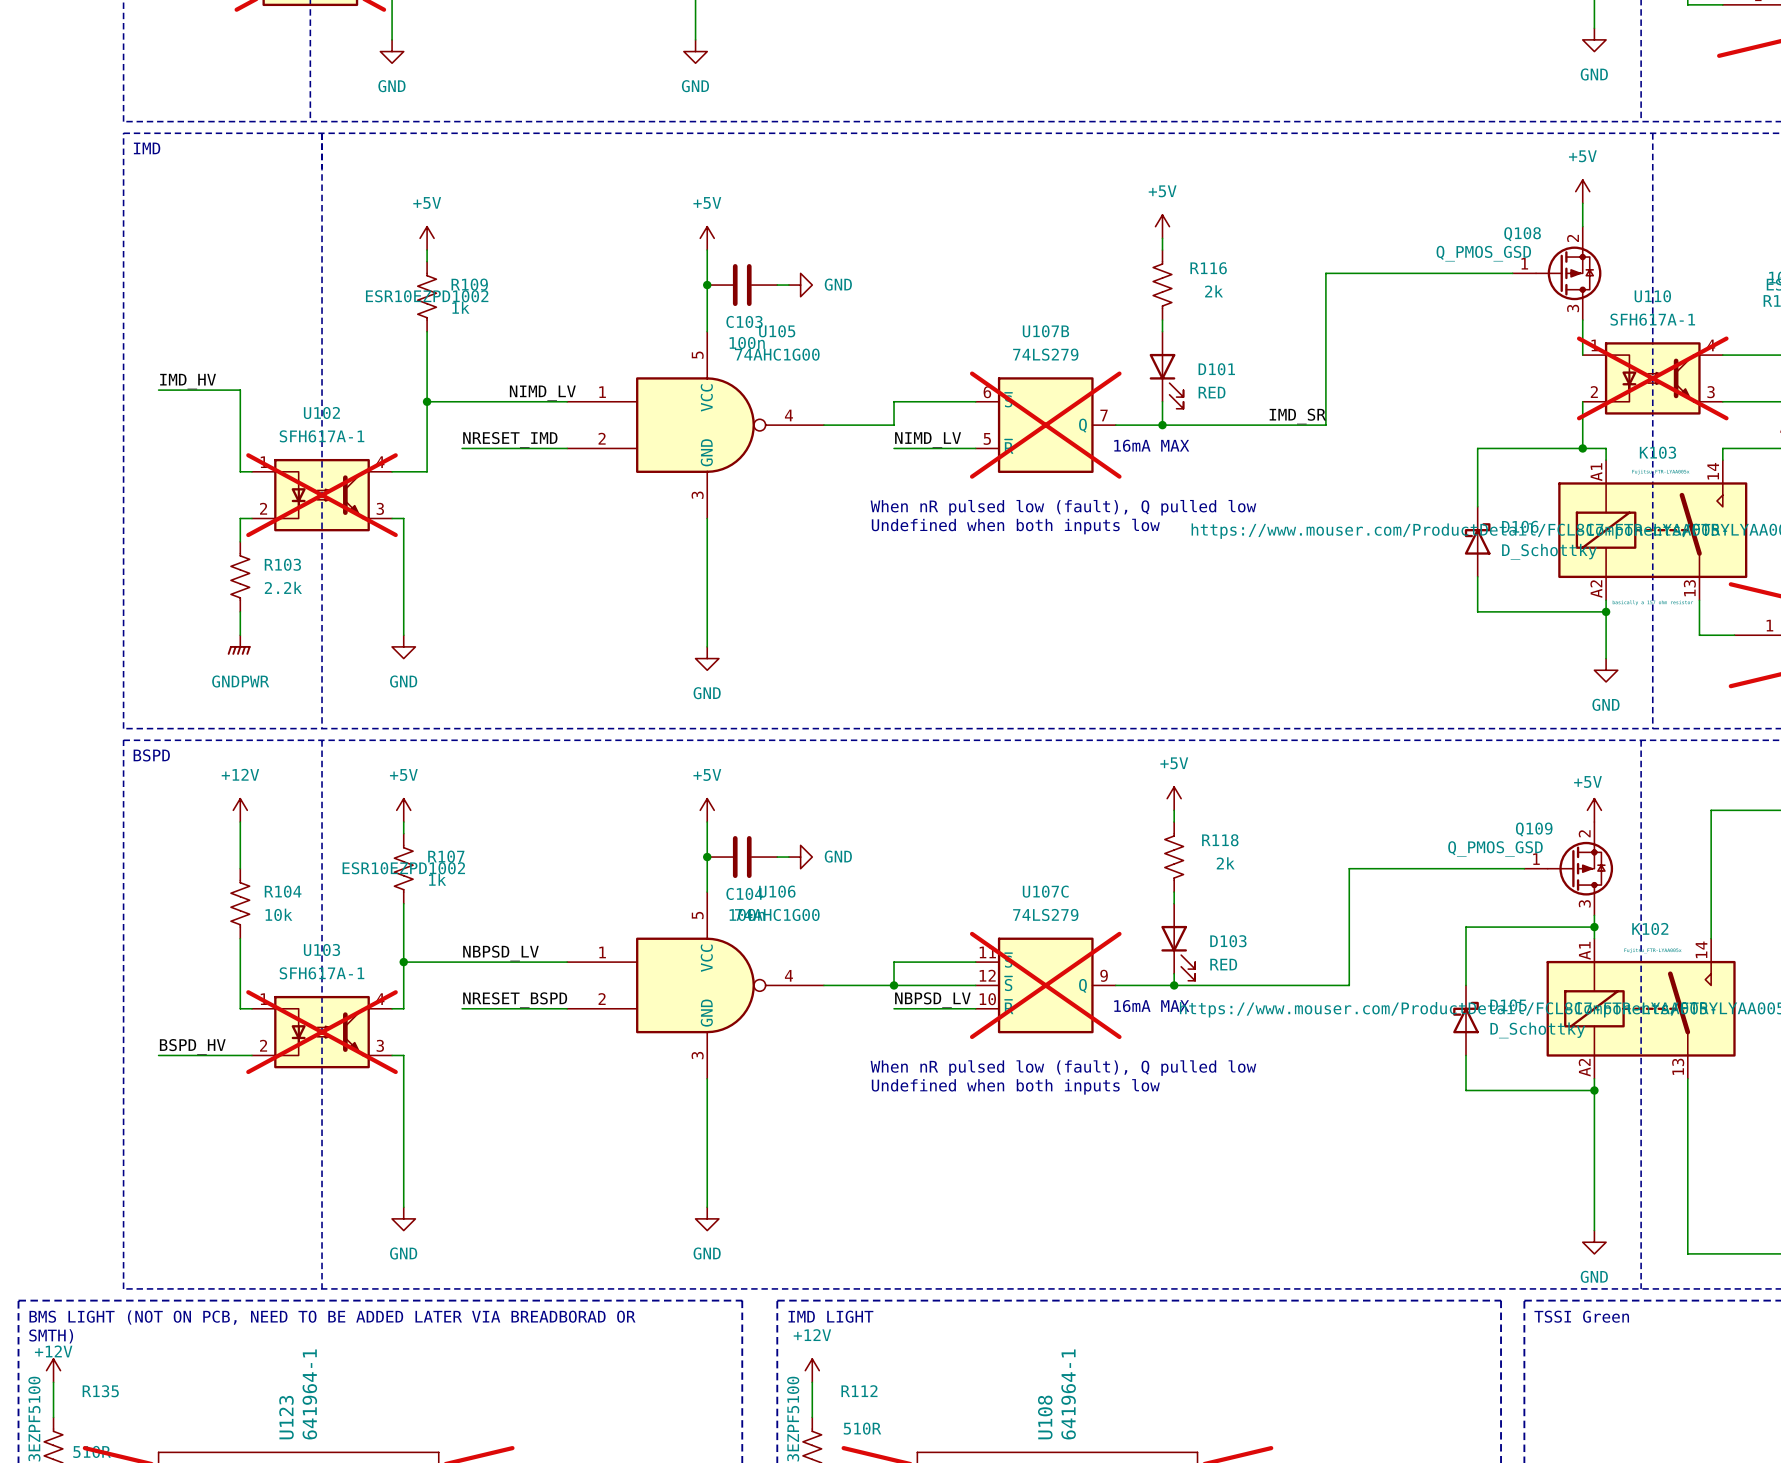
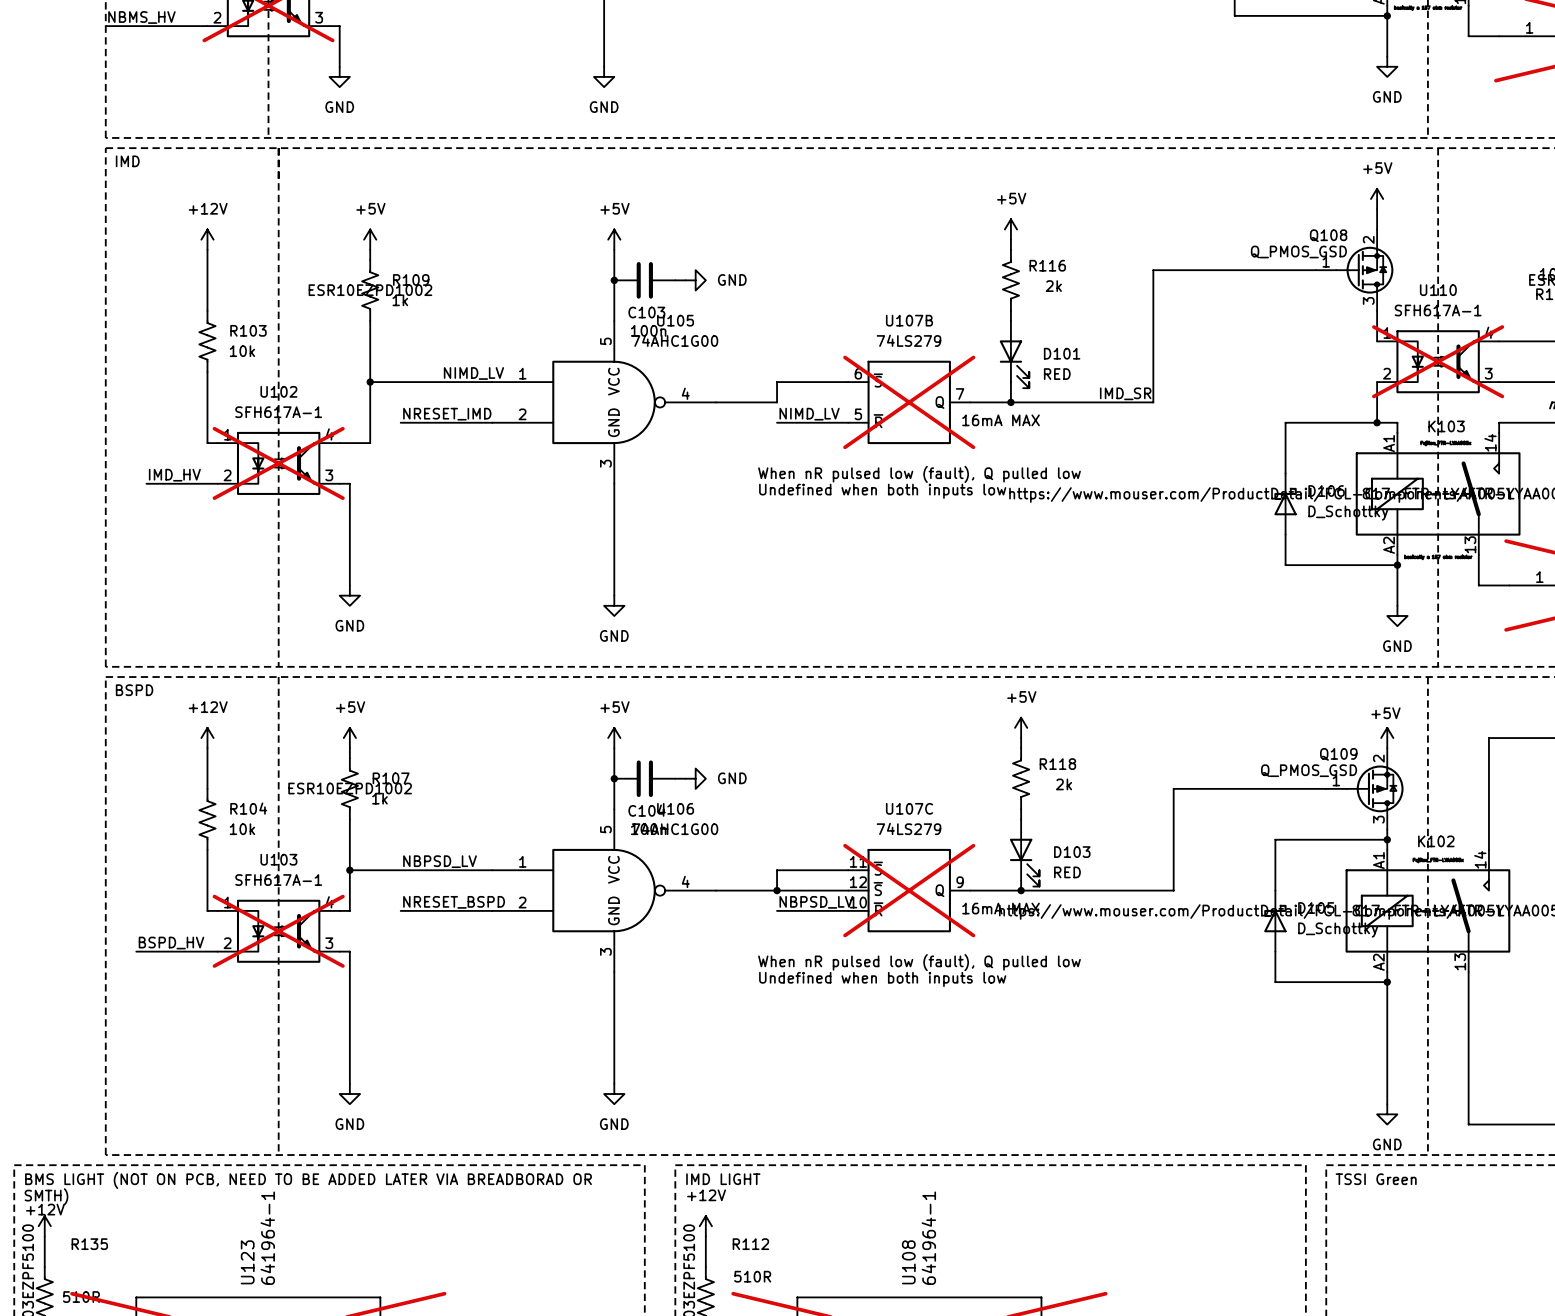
power symbol: none -> +12V (207, 239)
wire: none -> (207, 249) (207, 310)
label position: IMD_HV (188, 381) -> IMD_HV (174, 475)
wire: (158, 390) (240, 390) -> none
wire: (240, 518) (240, 541) -> (207, 483) (146, 483)
R103 position: (240, 576) -> (207, 341)
R103 value: 2.2k (283, 587) -> 10k (242, 351)
wire: (240, 611) (240, 635) -> none
power symbol: GNDPWR (239, 645) -> none

